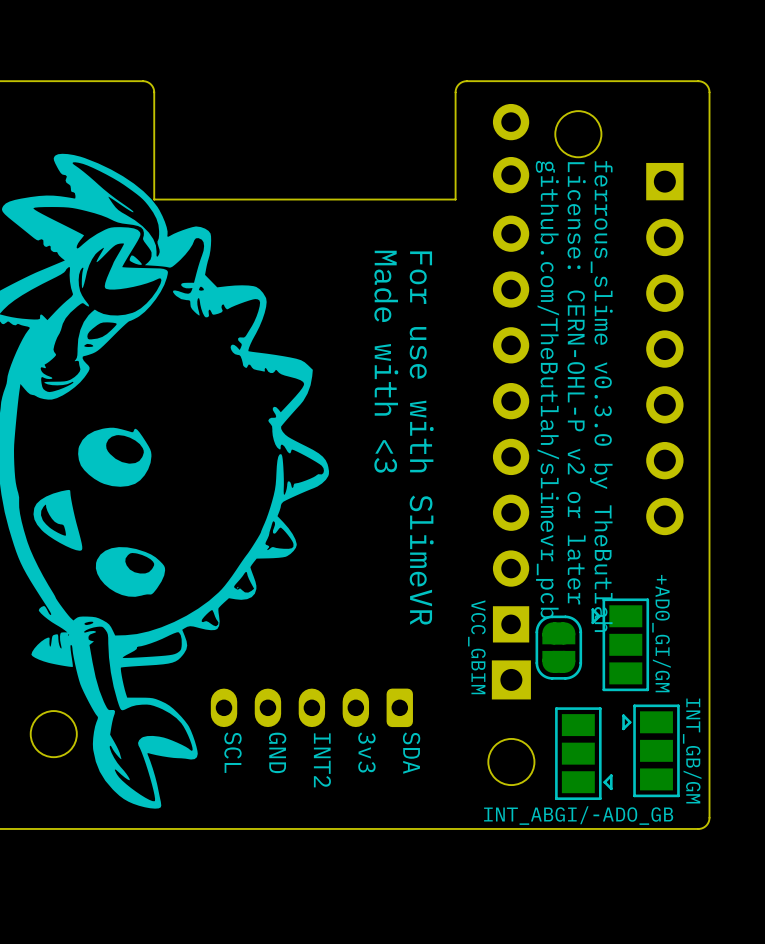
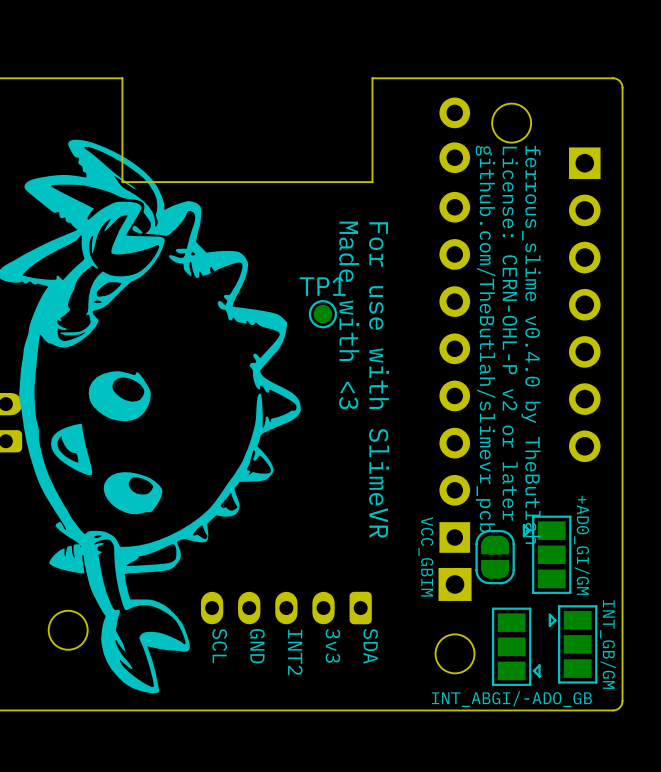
board edge: (466, 81) (458, 84) (455, 90) (455, 199) (154, 199) (153, 89) (145, 81) (117, 81) -> (417, 78) (372, 78) (372, 182) (122, 182) (122, 78)
TP1: none -> (322, 314)
text: ferrous_slime v0.3.0 by TheButlah (601, 396) -> ferrous_slime v0.4.0 by TheButlah (531, 344)

